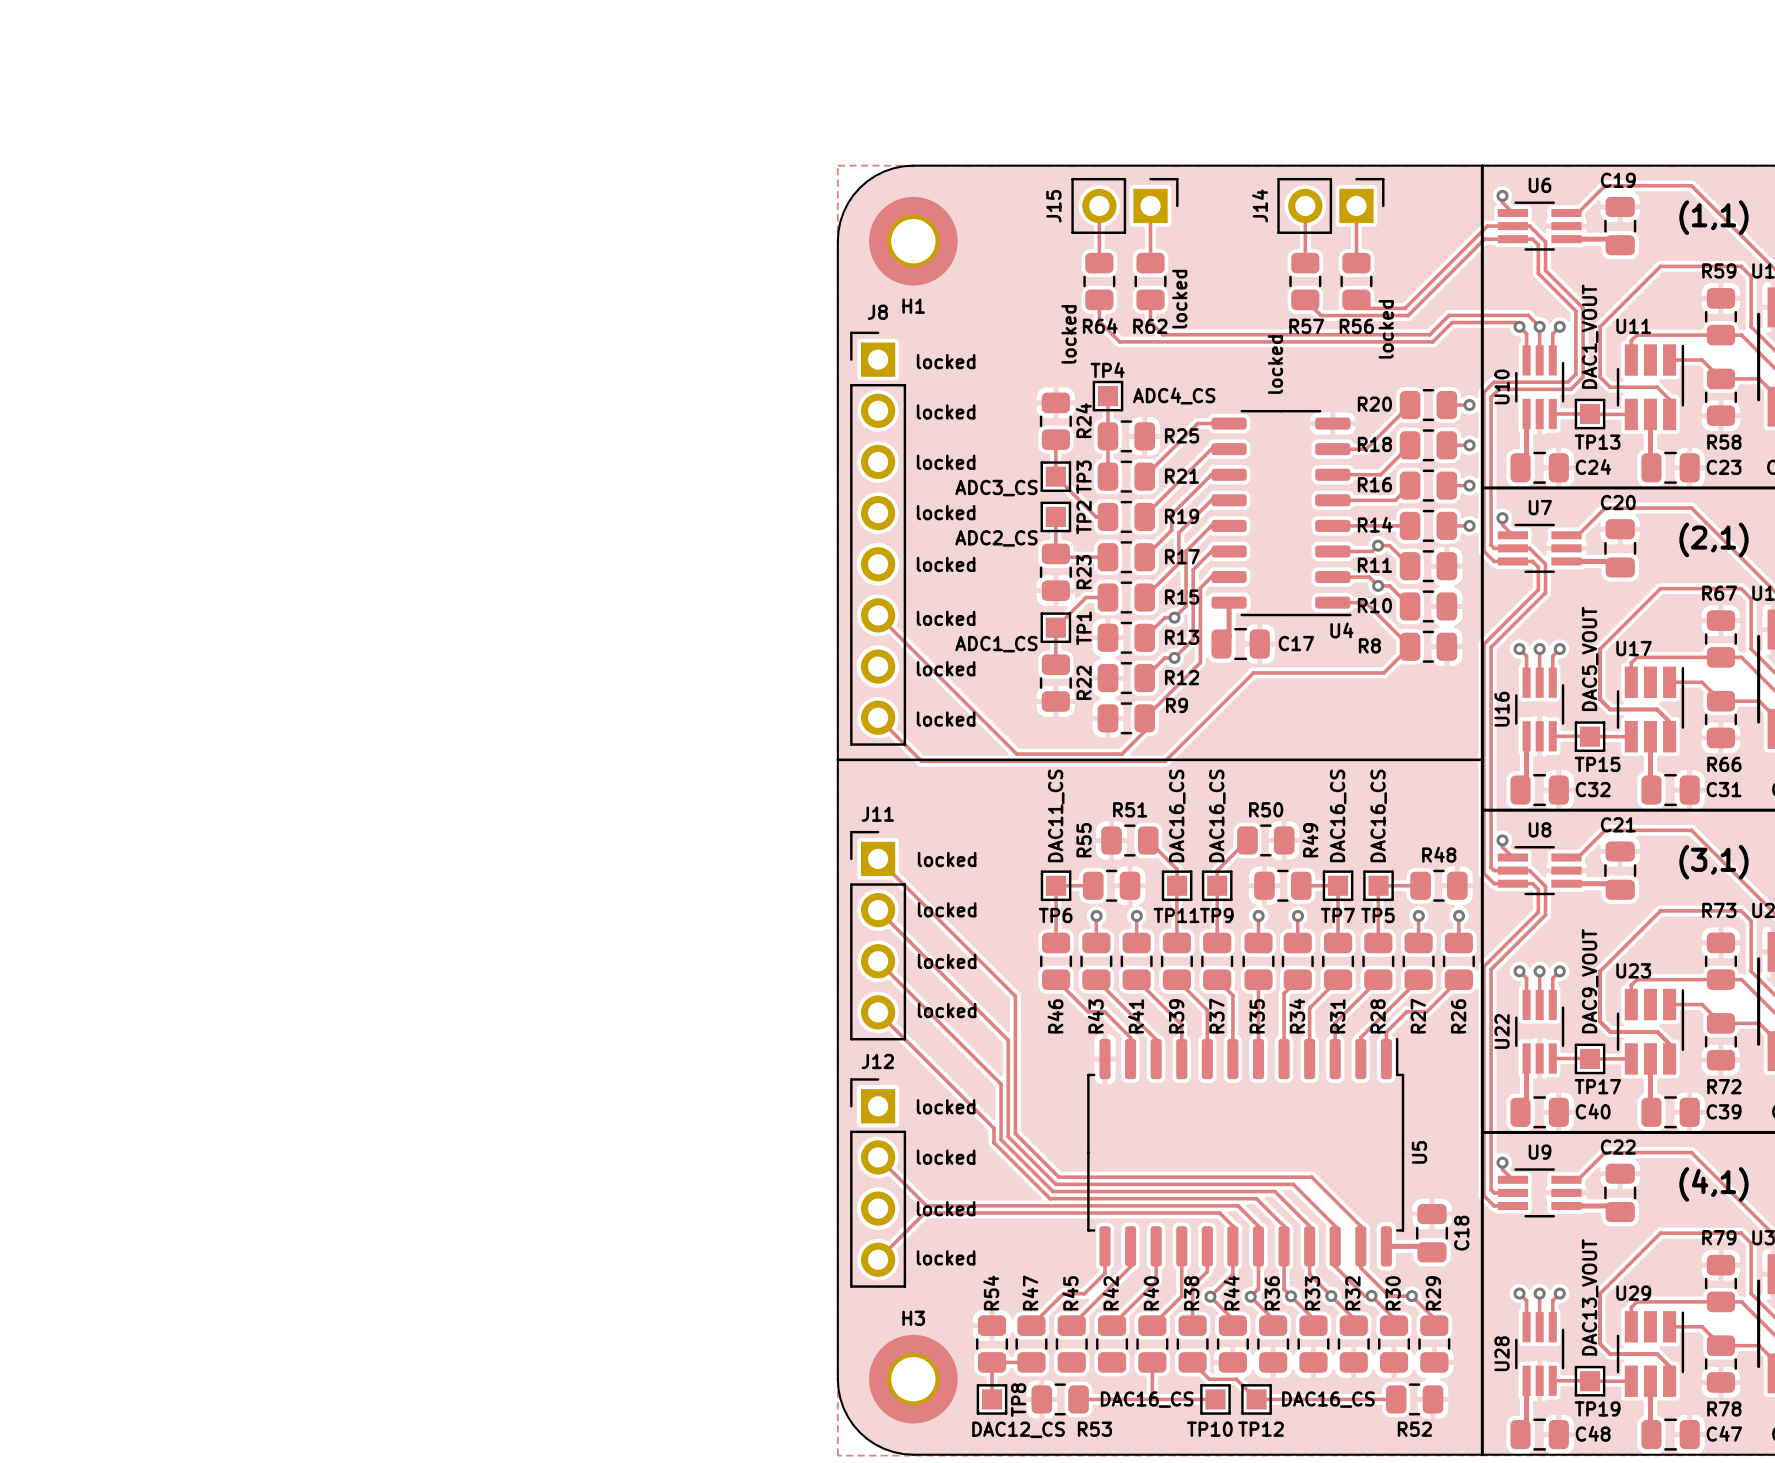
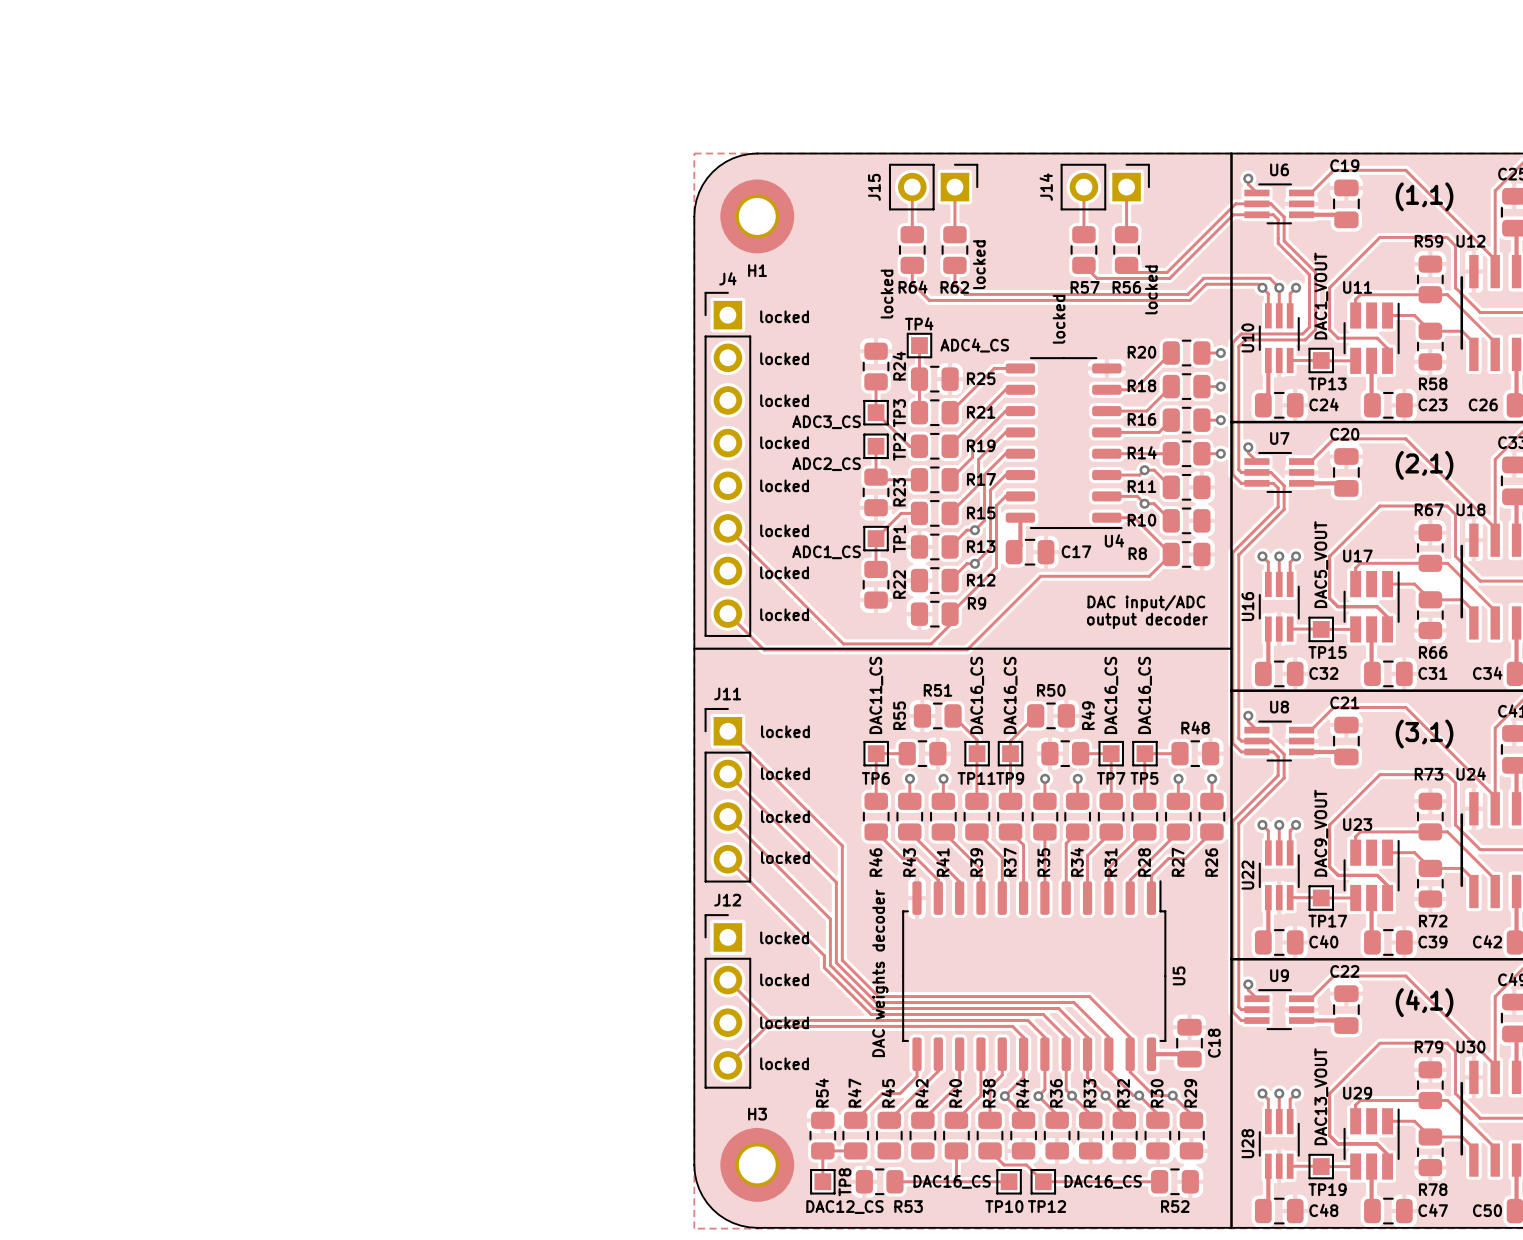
J8 name: J8 (877, 312) -> J4 (727, 278)
text: none -> DAC input/ADC (1146, 603)
text: none -> output decoder (1147, 620)
text: none -> DAC weights decoder (880, 973)

